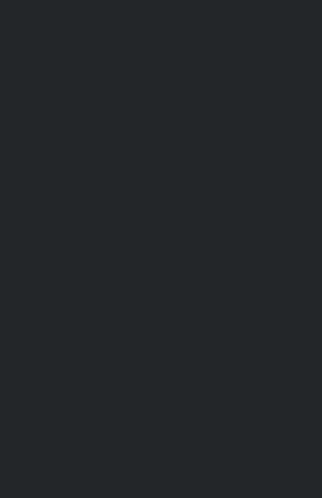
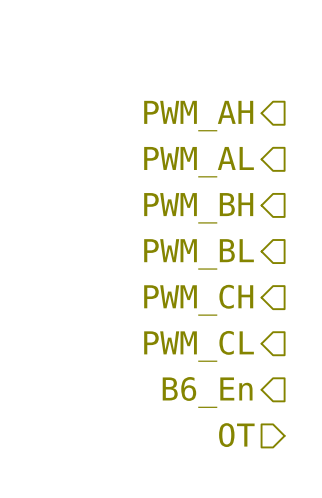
hierarchical label: none -> PWM_AH (198, 116)
hierarchical label: none -> PWM_AL (199, 162)
hierarchical label: none -> PWM_BH (198, 208)
hierarchical label: none -> PWM_BL (199, 254)
hierarchical label: none -> PWM_CH (198, 300)
hierarchical label: none -> PWM_CL (199, 346)
hierarchical label: none -> B6_En (207, 392)
hierarchical label: none -> OT (236, 435)

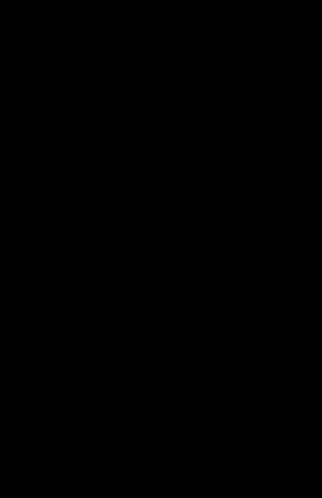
hierarchical label: PWM_AH (198, 116) -> none
hierarchical label: PWM_AL (199, 162) -> none
hierarchical label: PWM_BH (198, 208) -> none
hierarchical label: PWM_BL (199, 254) -> none
hierarchical label: PWM_CH (198, 300) -> none
hierarchical label: PWM_CL (199, 346) -> none
hierarchical label: B6_En (207, 392) -> none
hierarchical label: OT (236, 435) -> none

